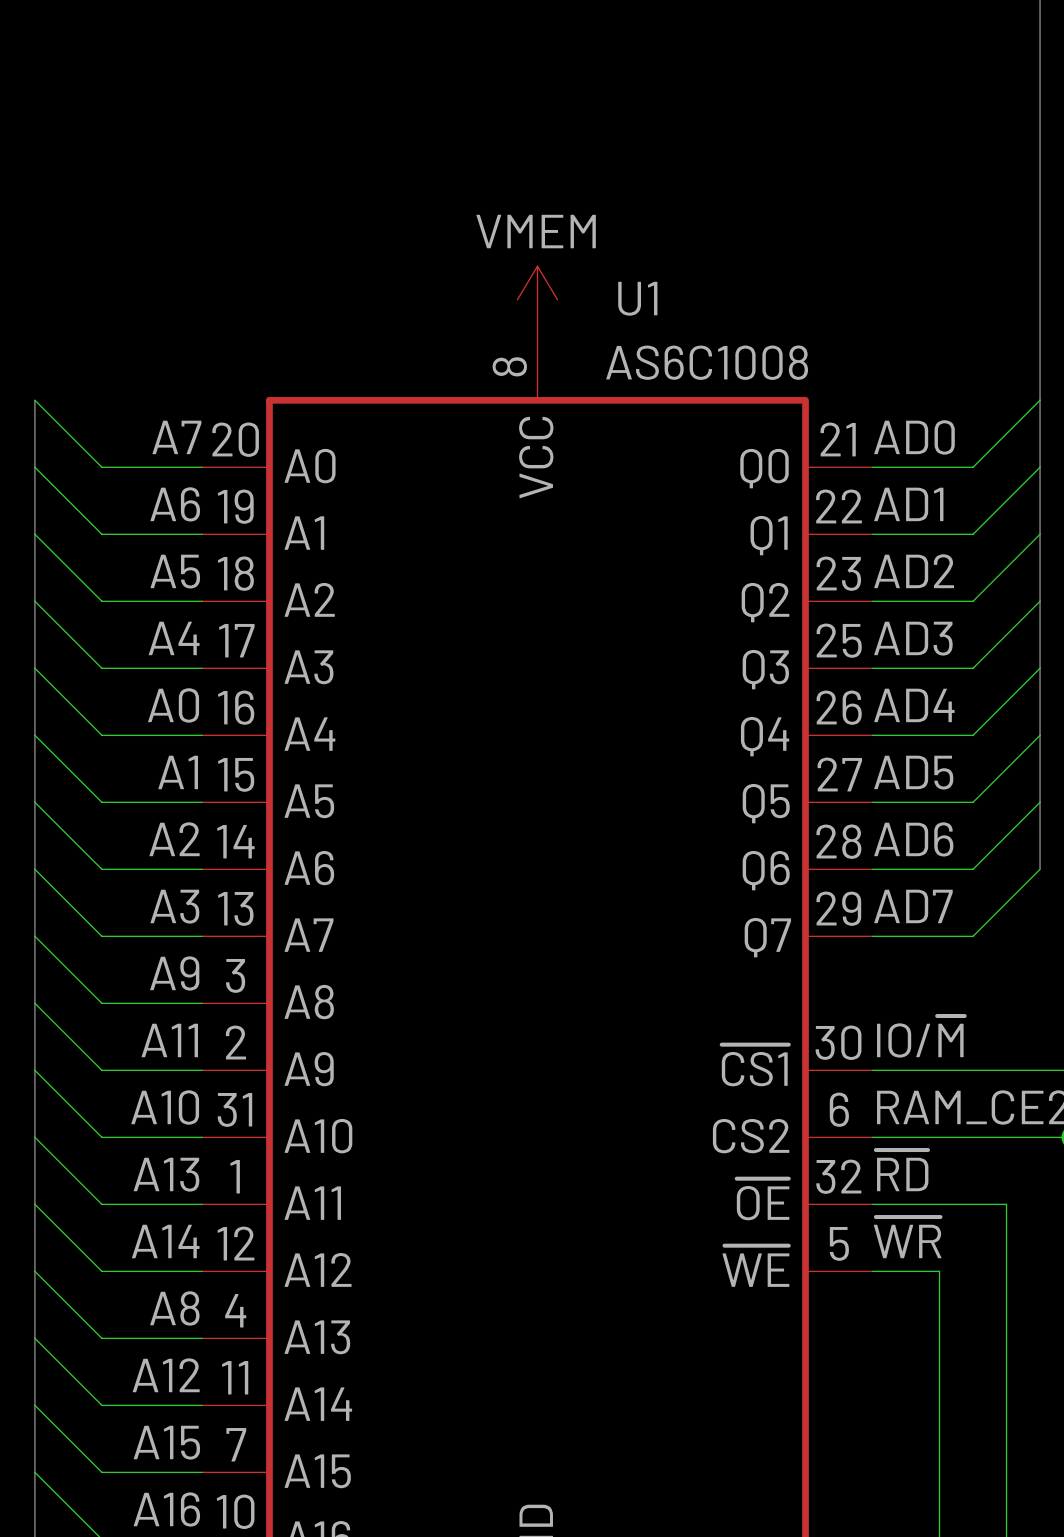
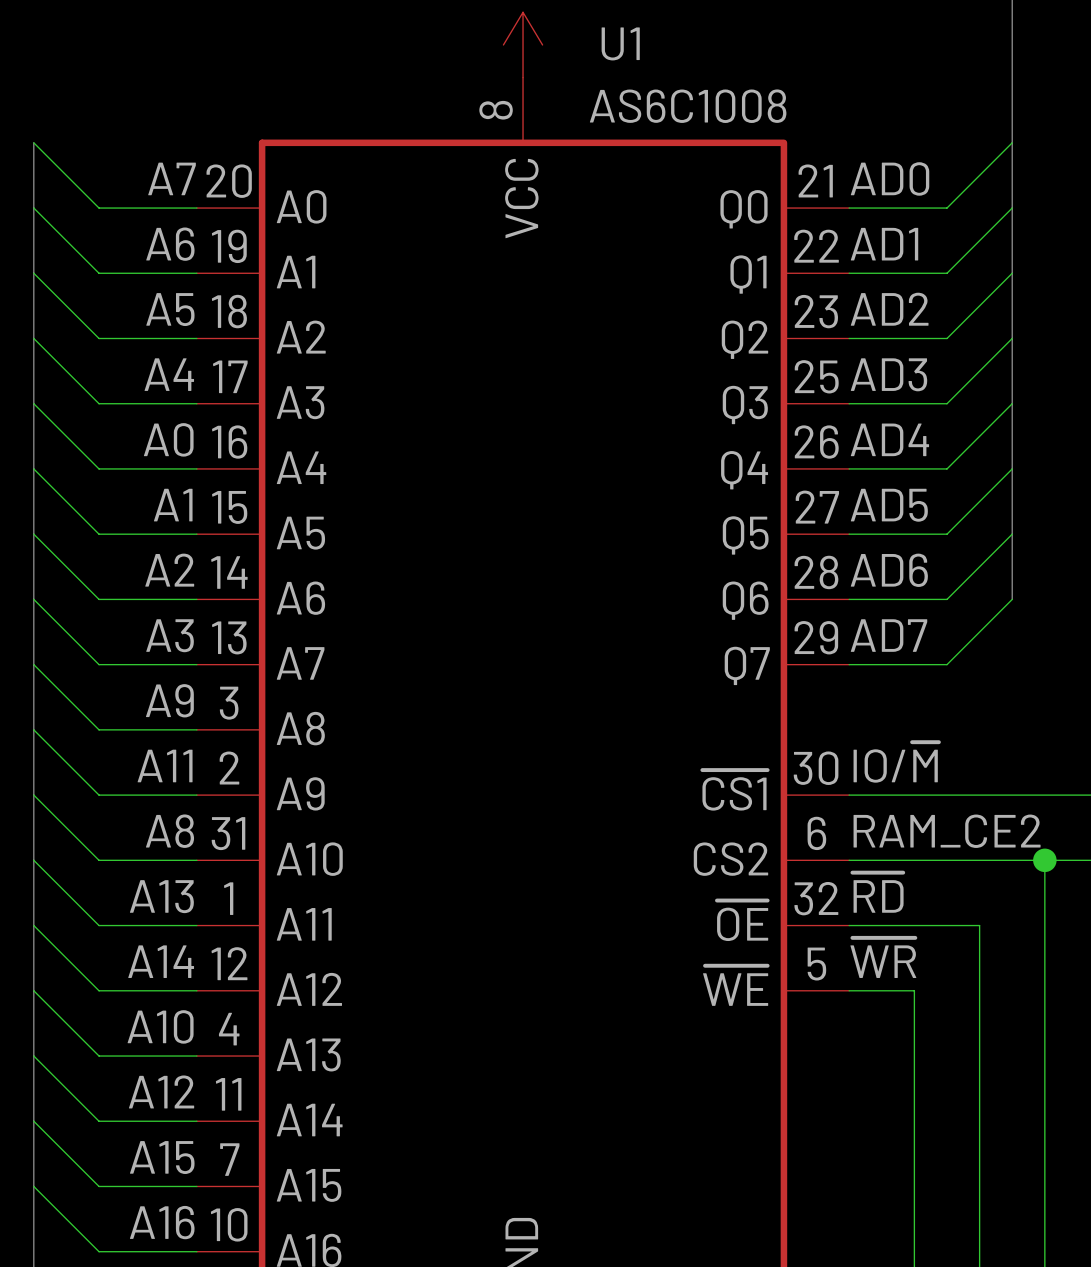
label: A10 (165, 1107) -> A8 (169, 831)
label: A8 (174, 1308) -> A10 (160, 1026)

